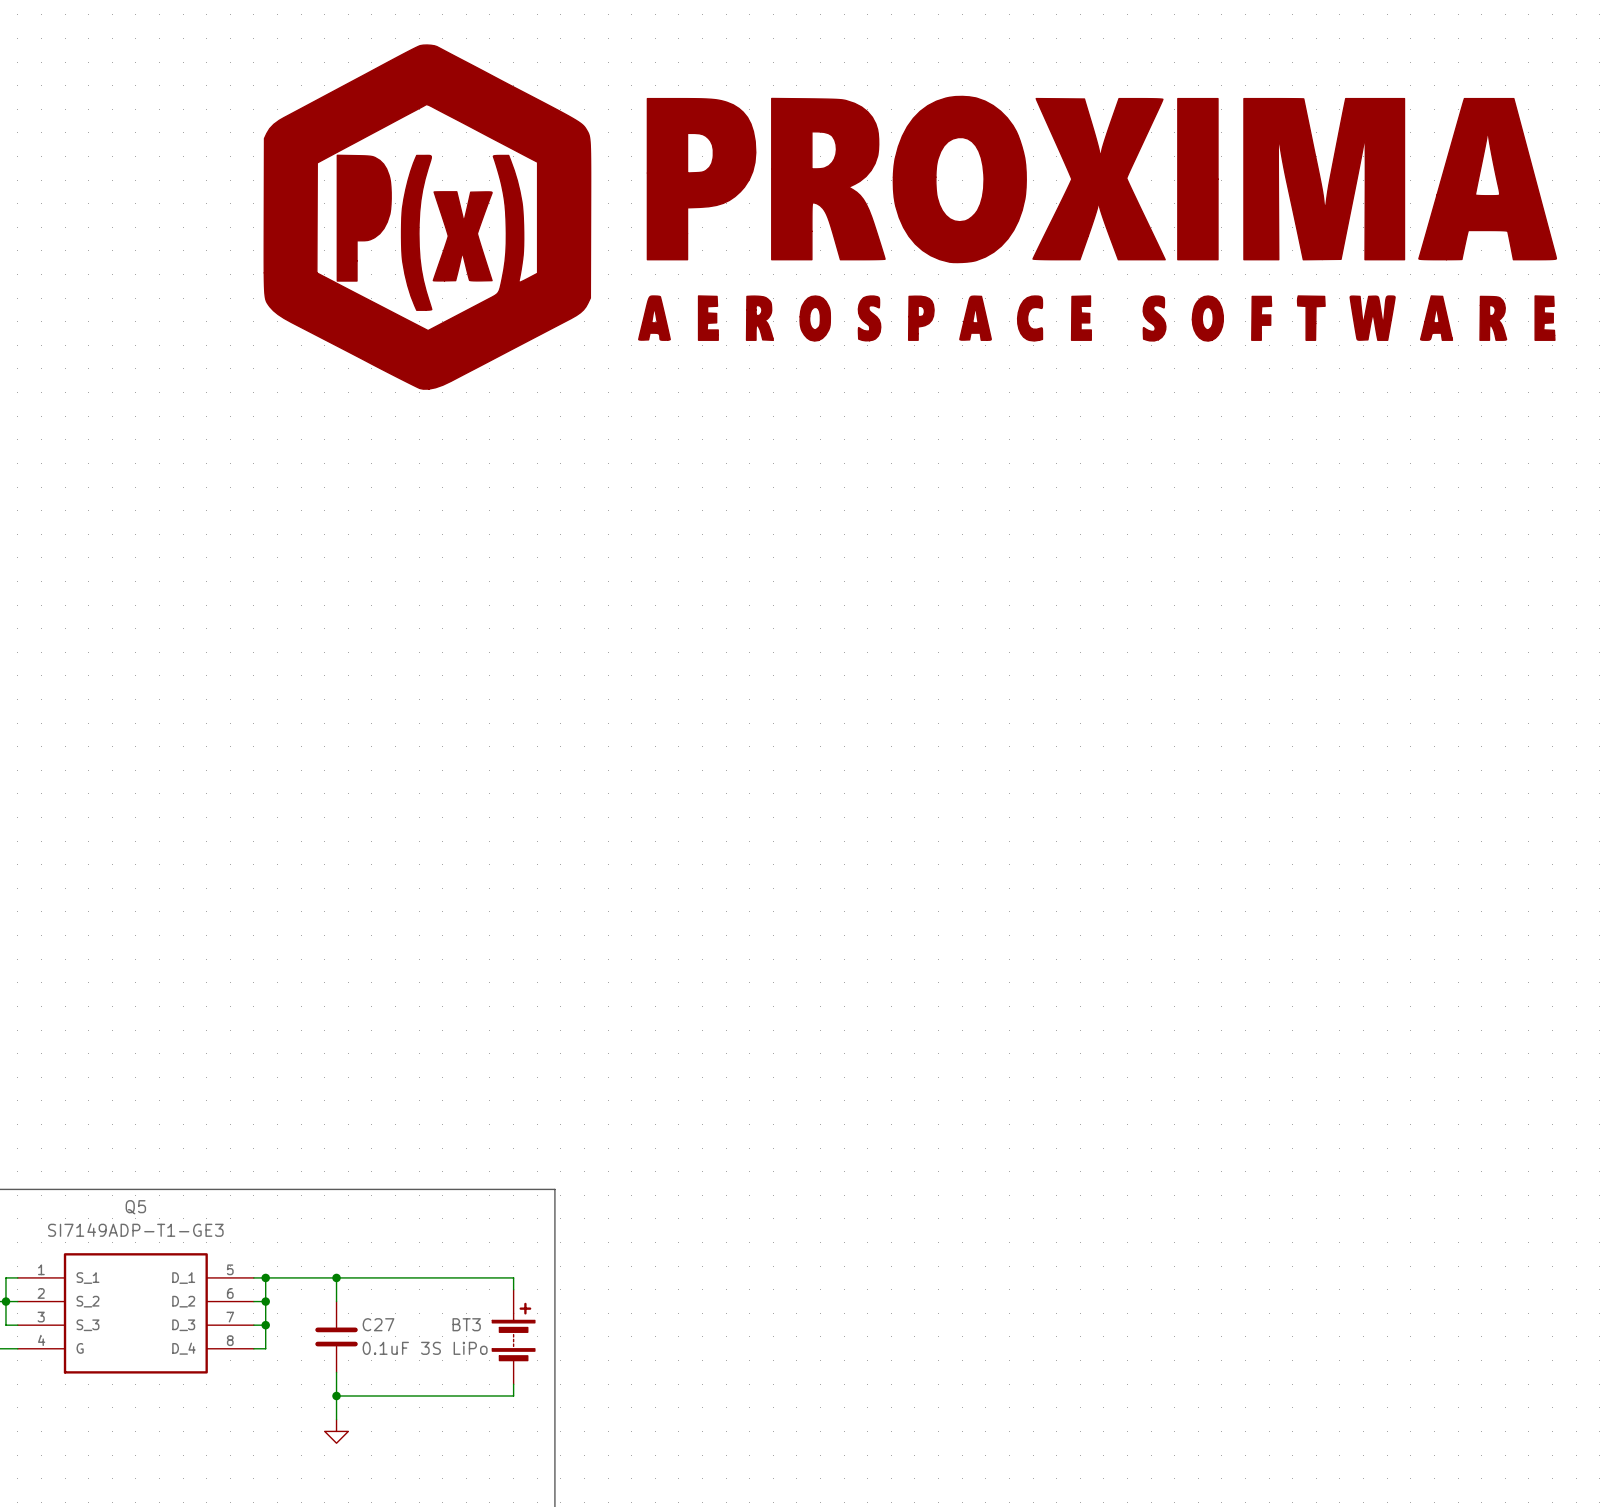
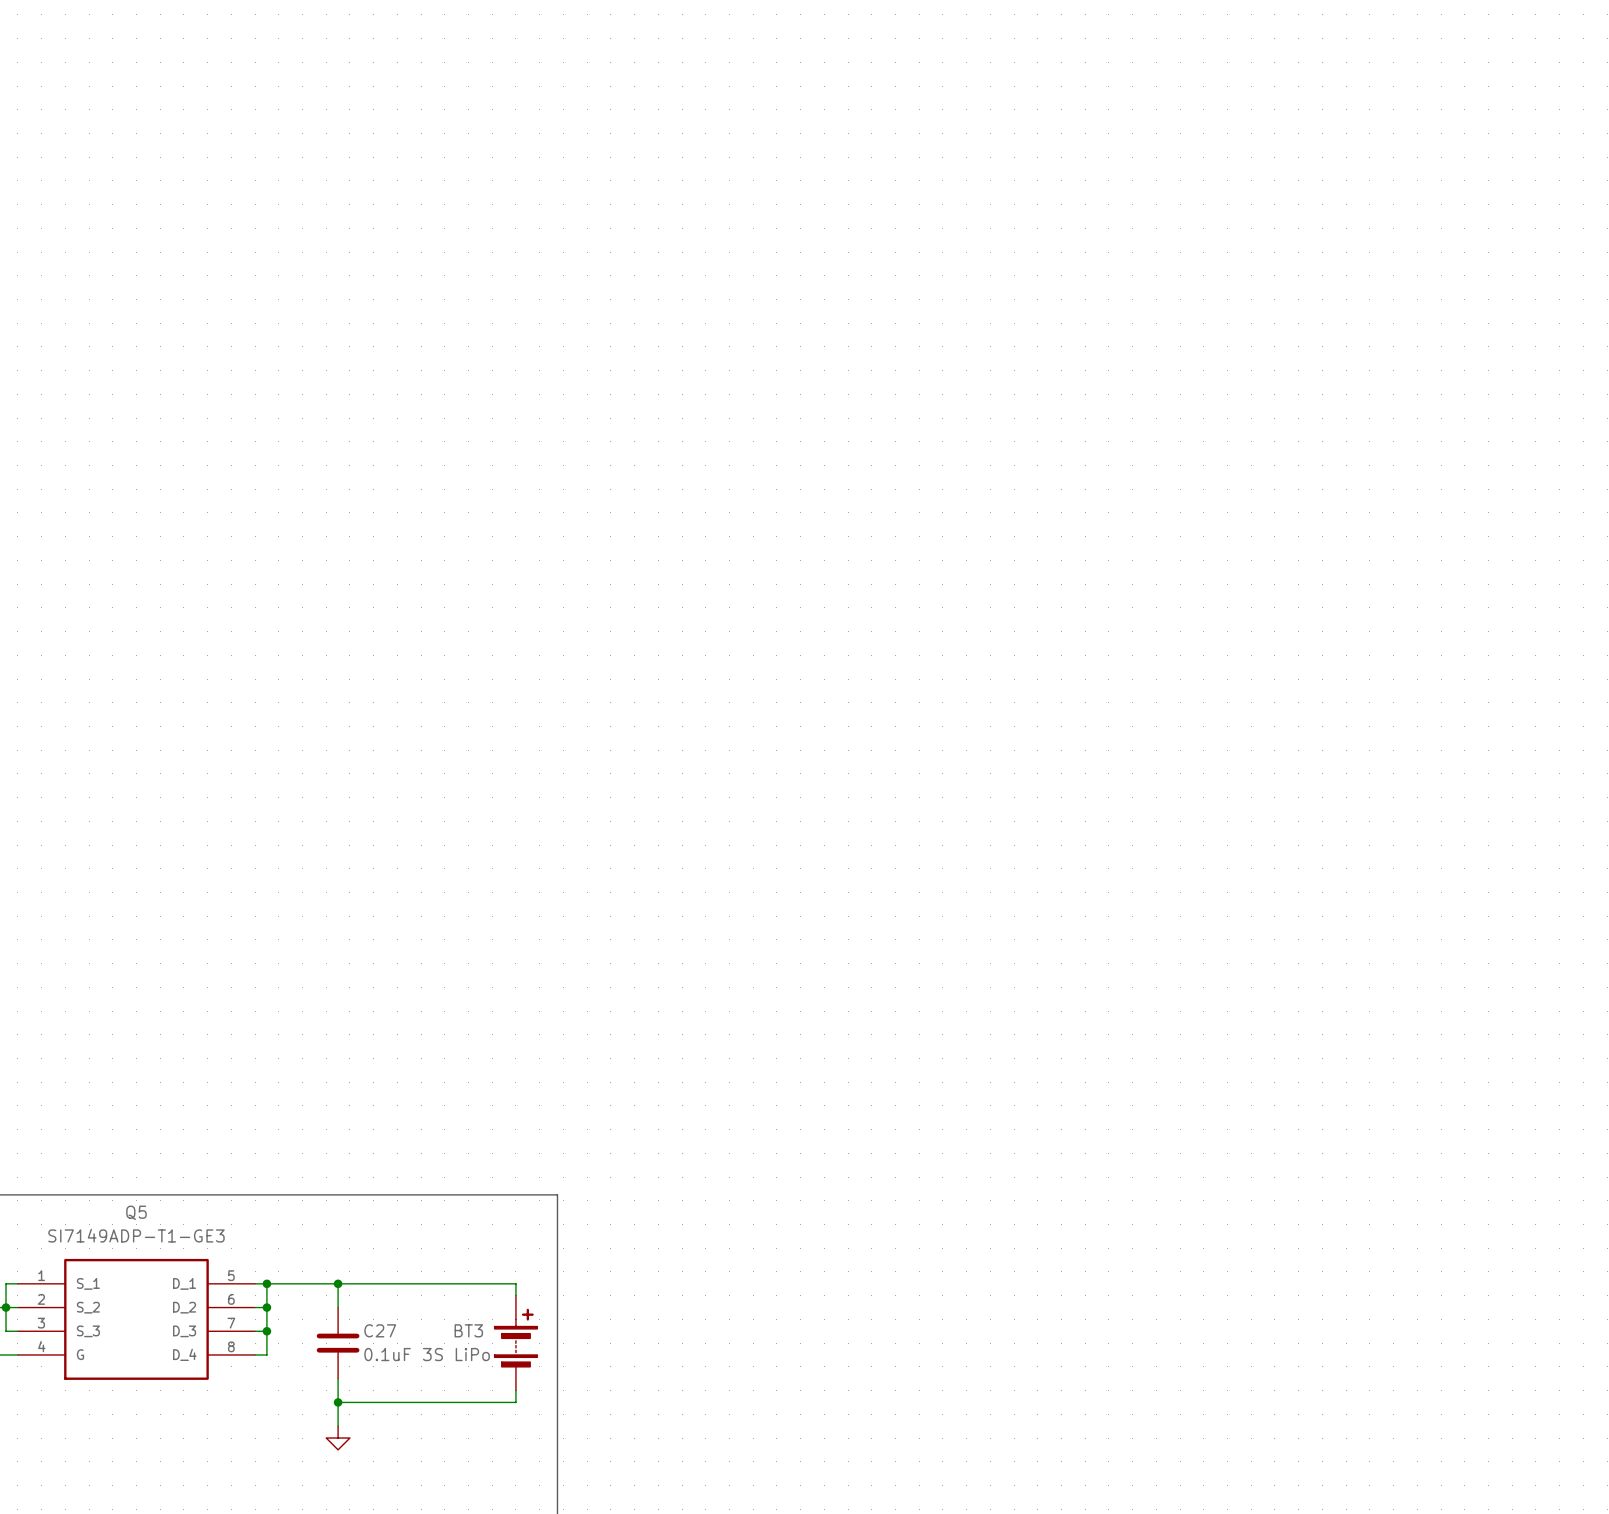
power symbol: (910, 217) -> none

